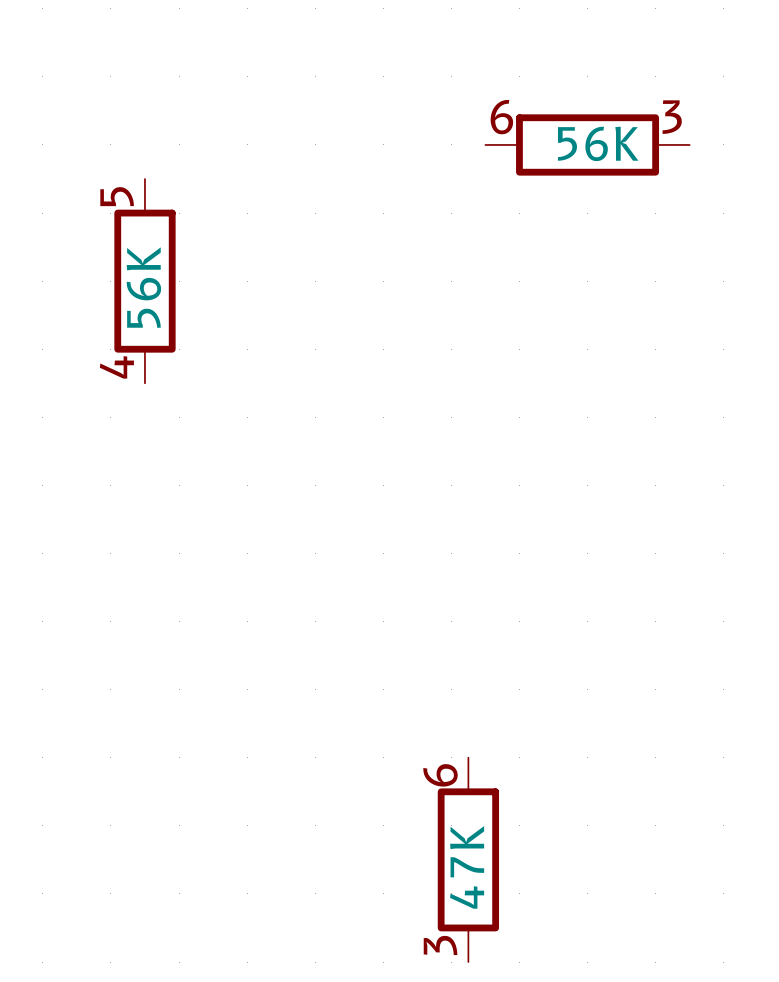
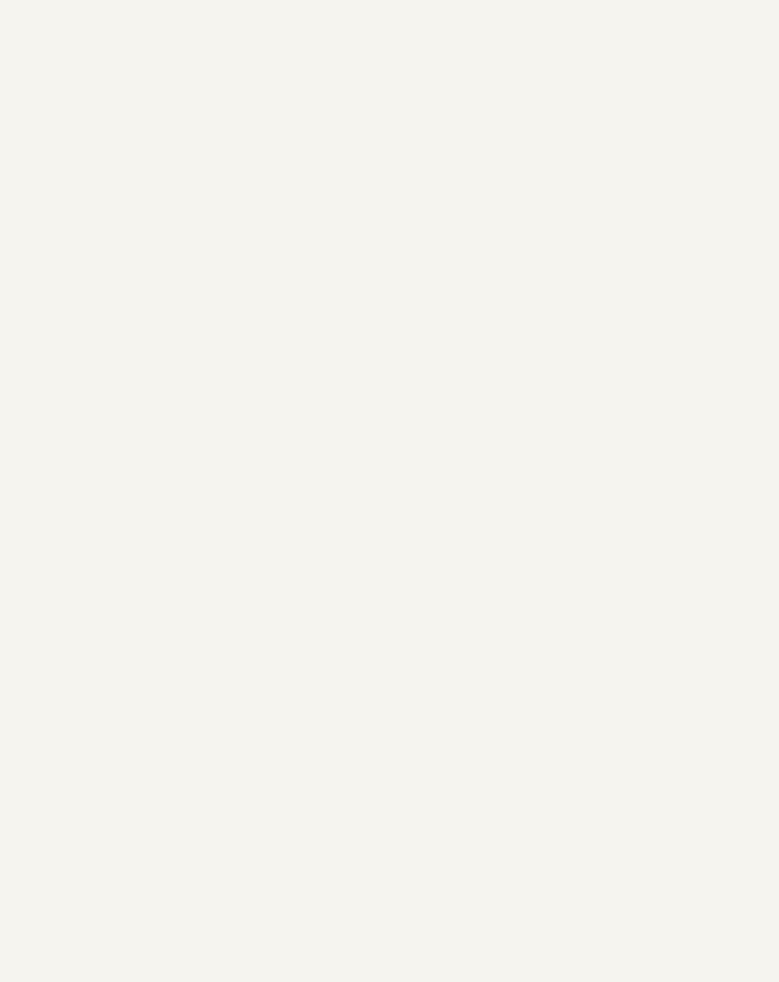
part: 56K (587, 144) -> none
part: 56K (144, 281) -> none
part: 47K (468, 859) -> none

